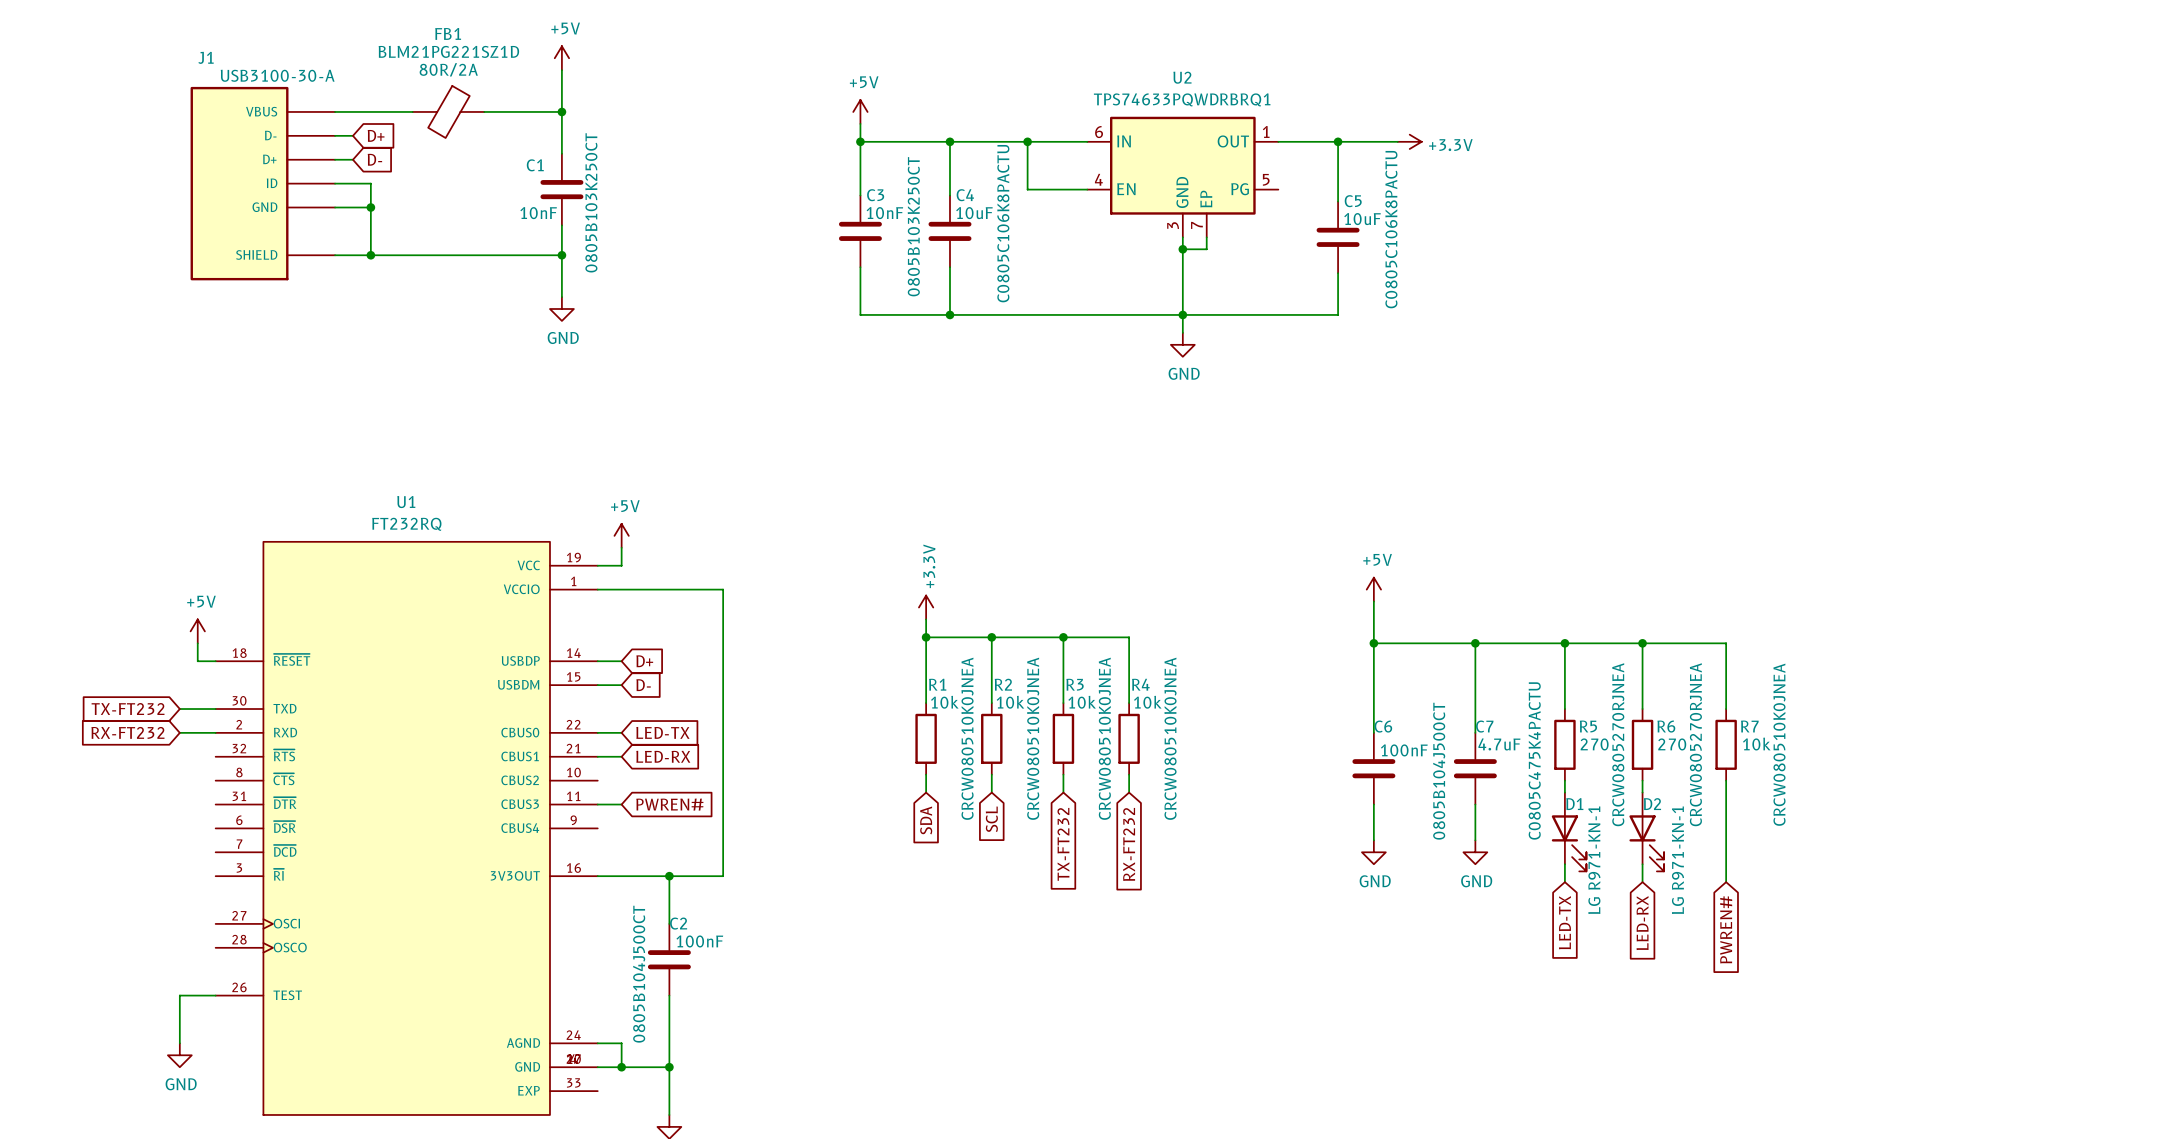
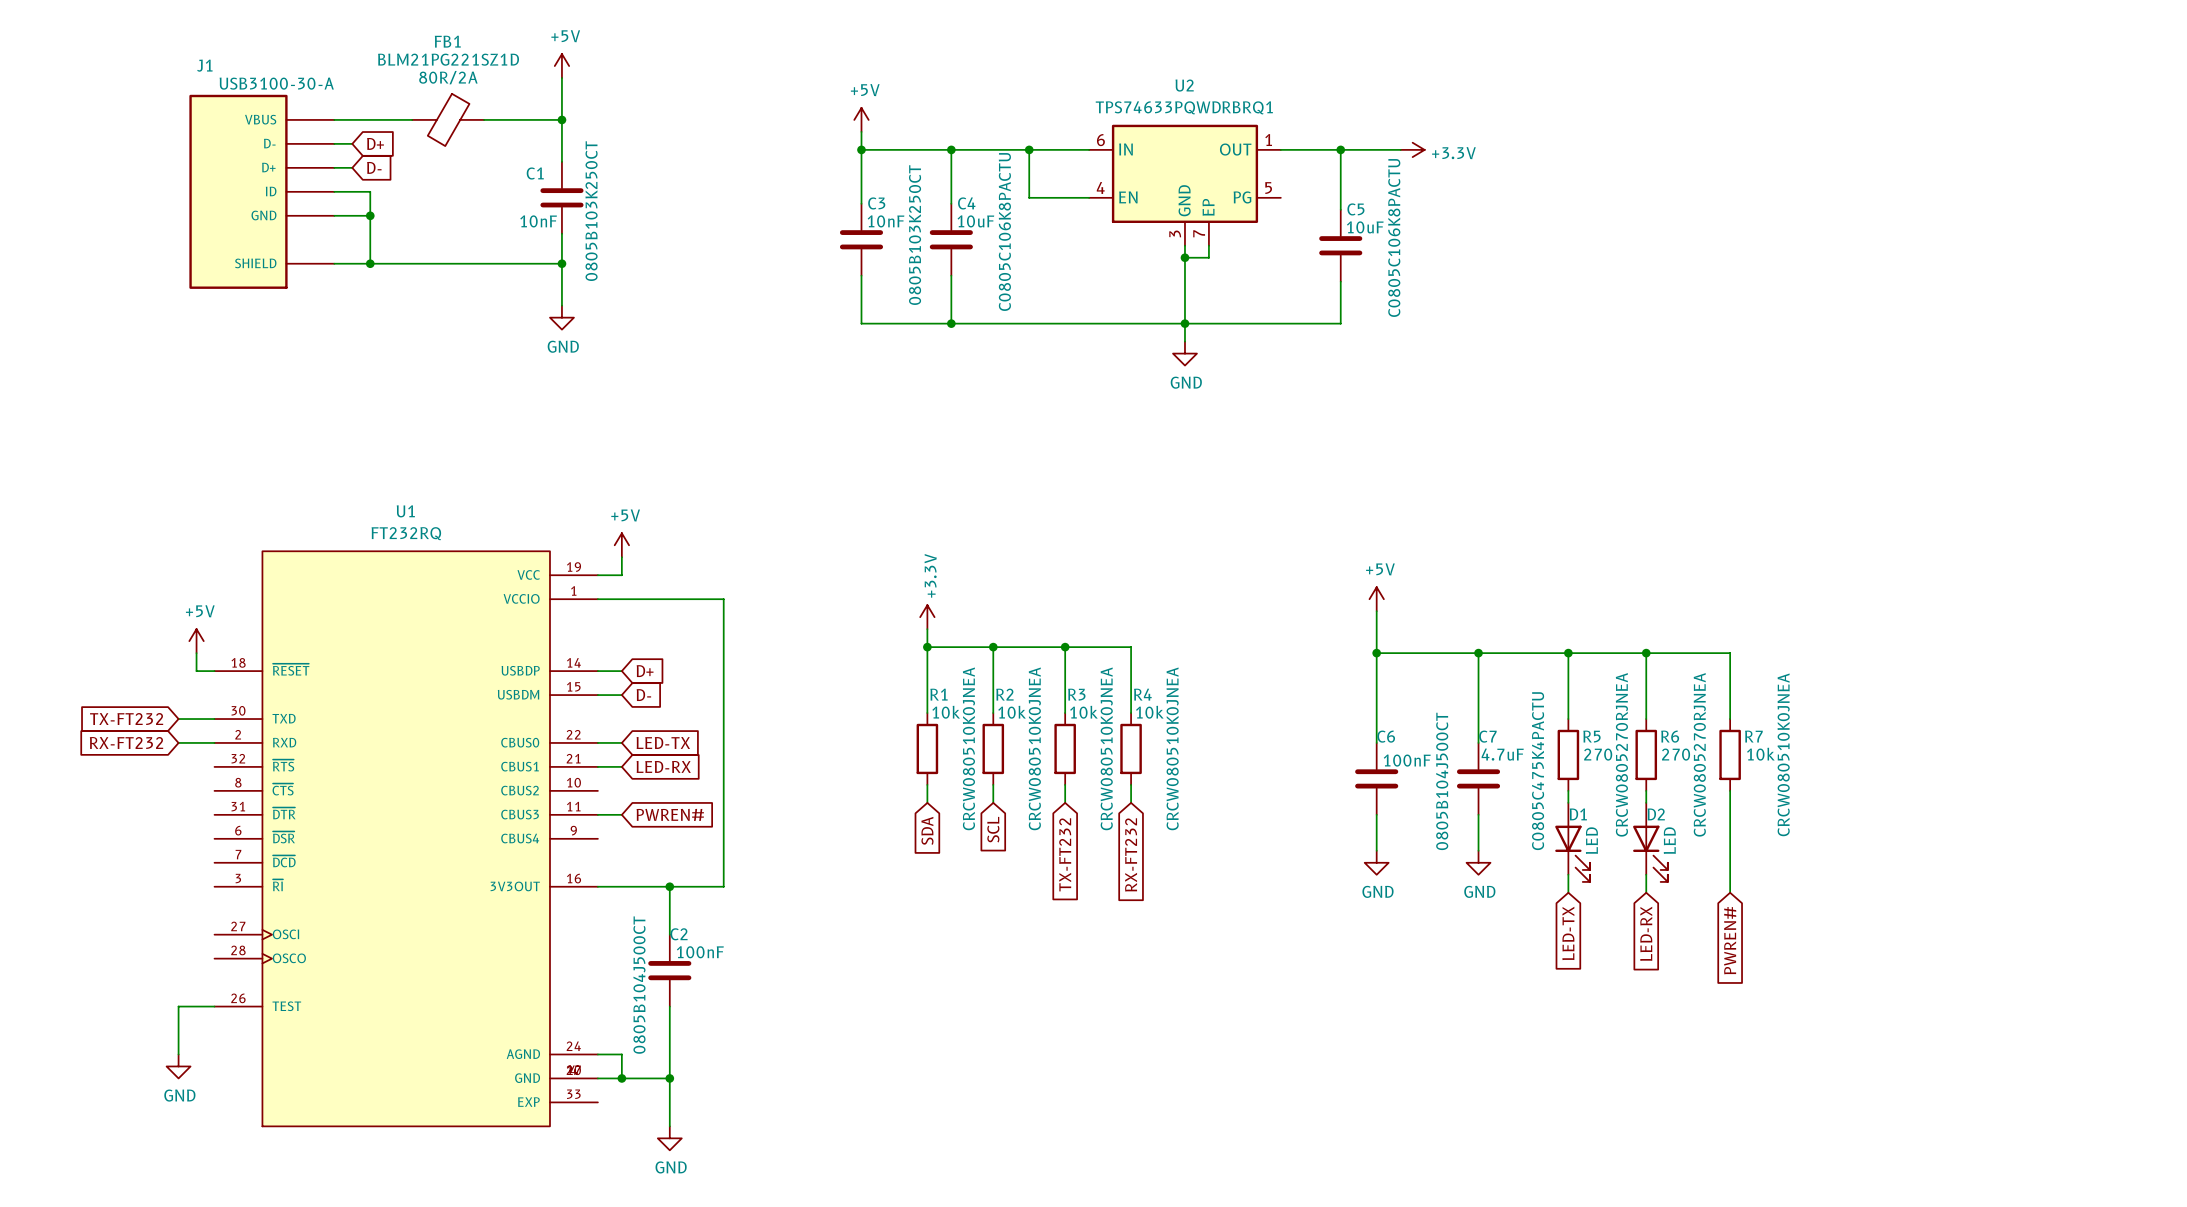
D1 value: LG R971-KN-1 (1594, 860) -> LED (1591, 840)
D2 value: LG R971-KN-1 (1677, 860) -> LED (1669, 840)

